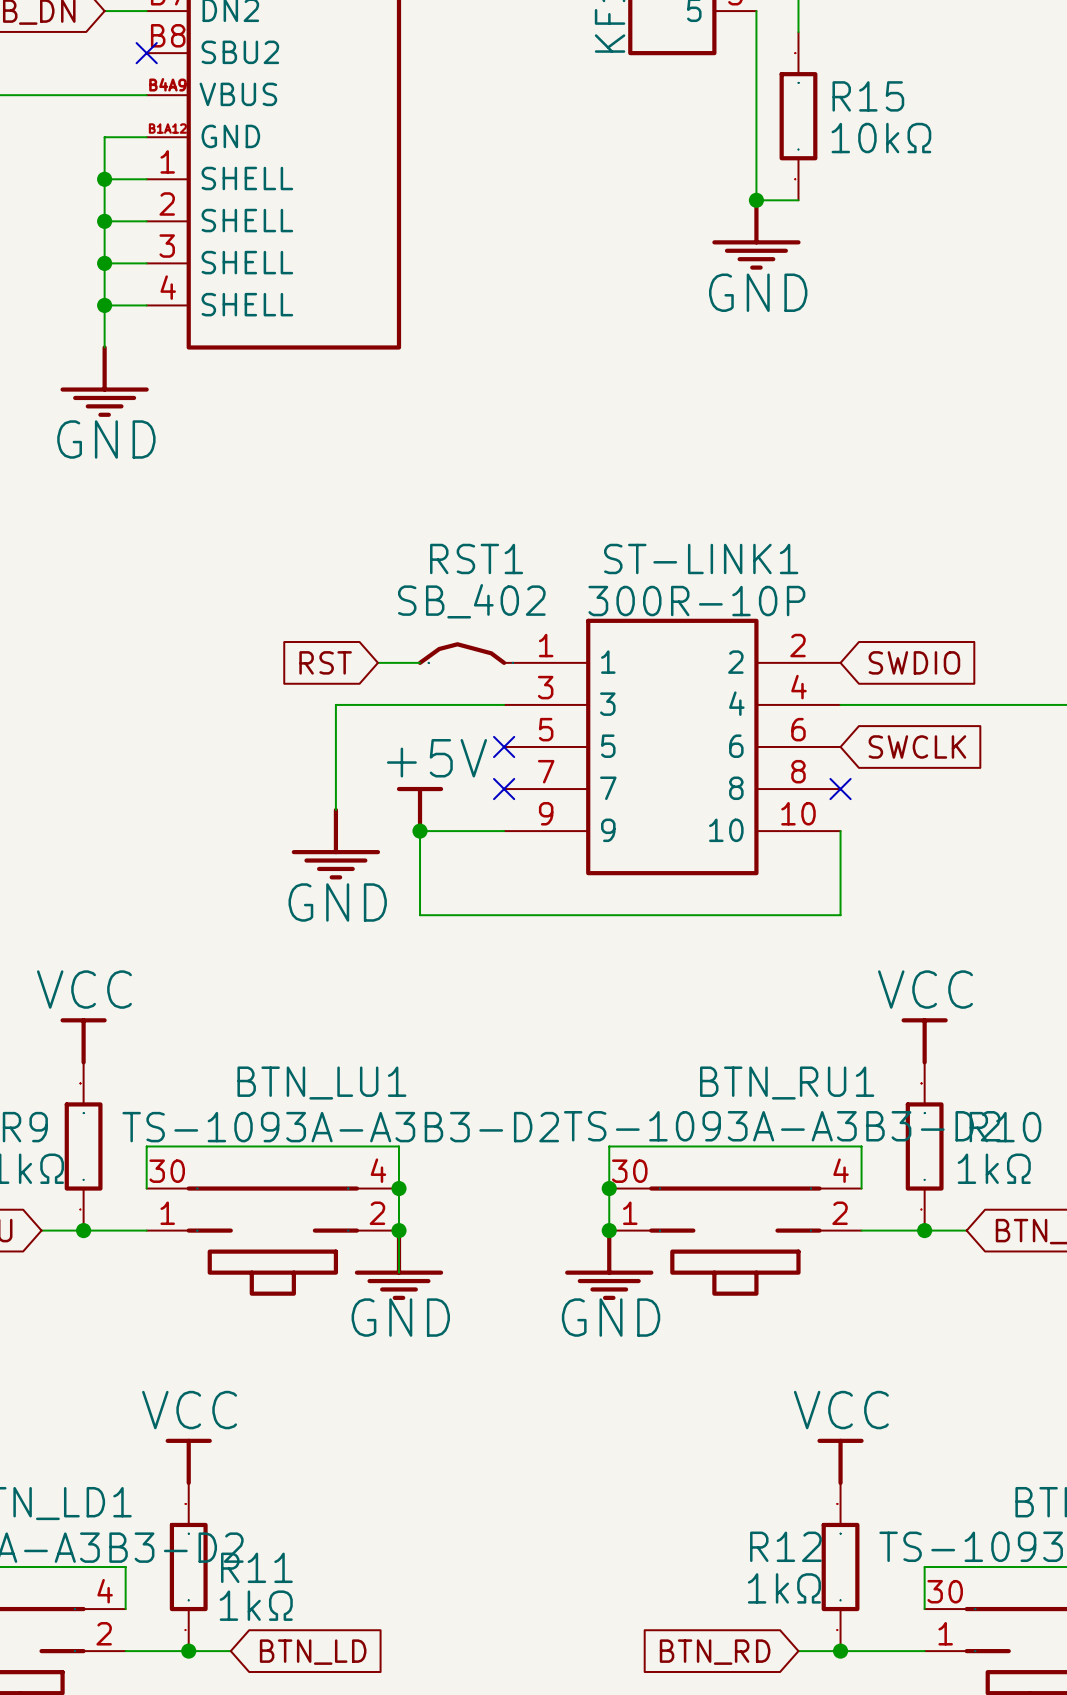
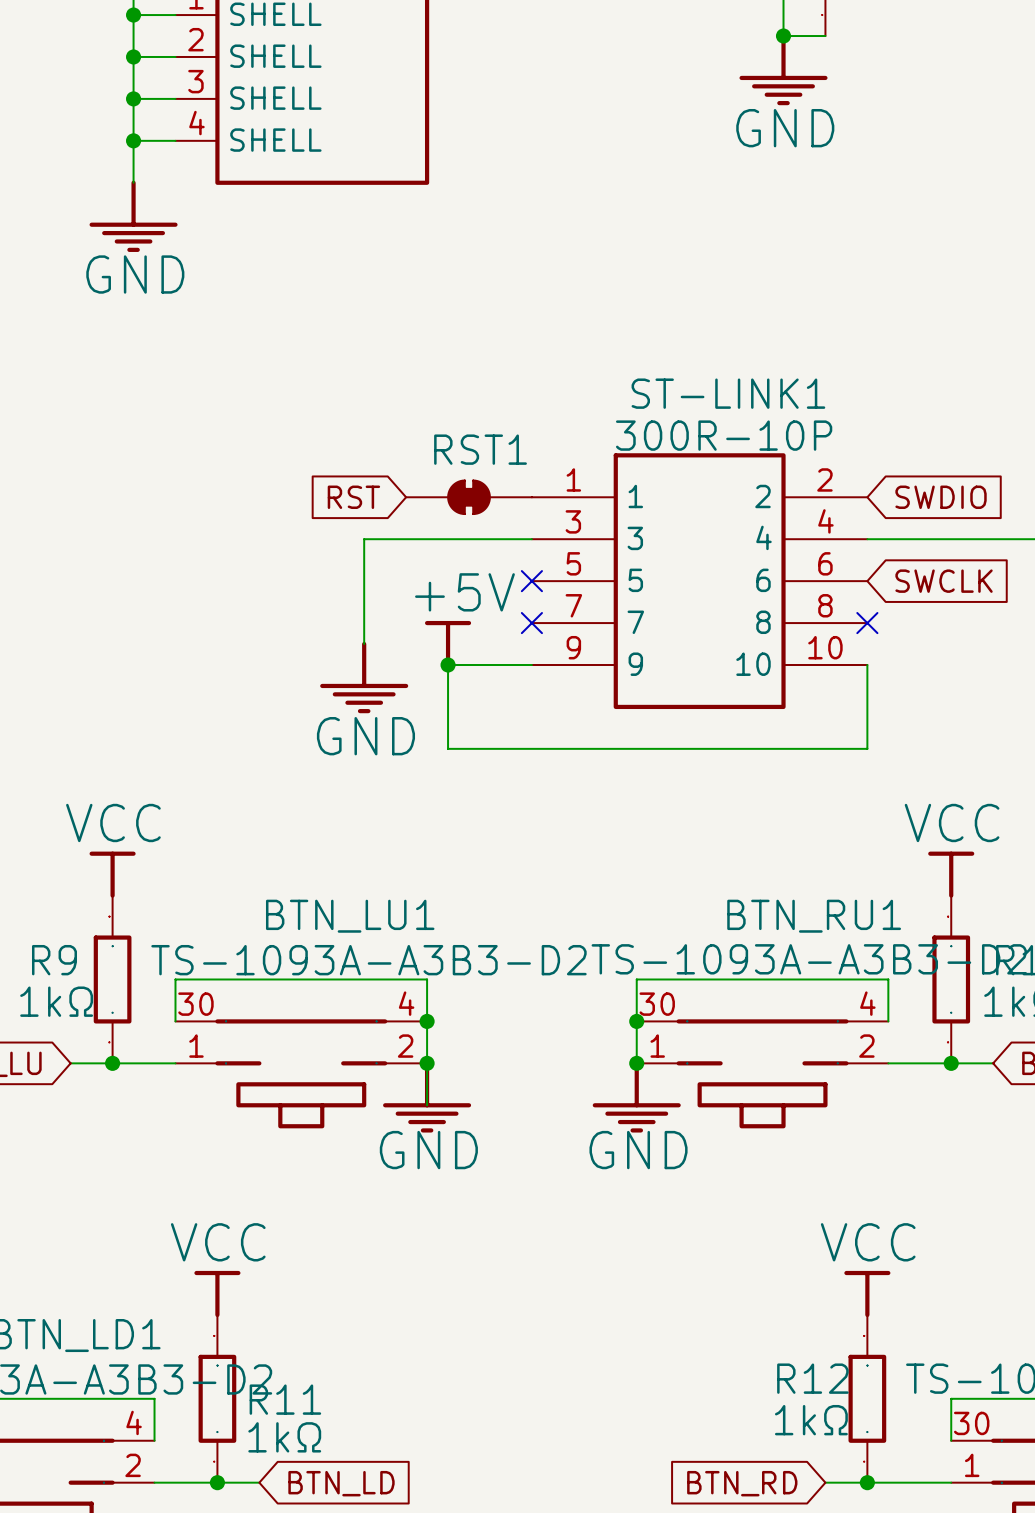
RST1 name position: RST1 (476, 558) -> RST1 (480, 449)
RST1 value: SB_402 (471, 601) -> none
RST1 symbol: [417, 642, 507, 665] -> [406, 480, 532, 515]

